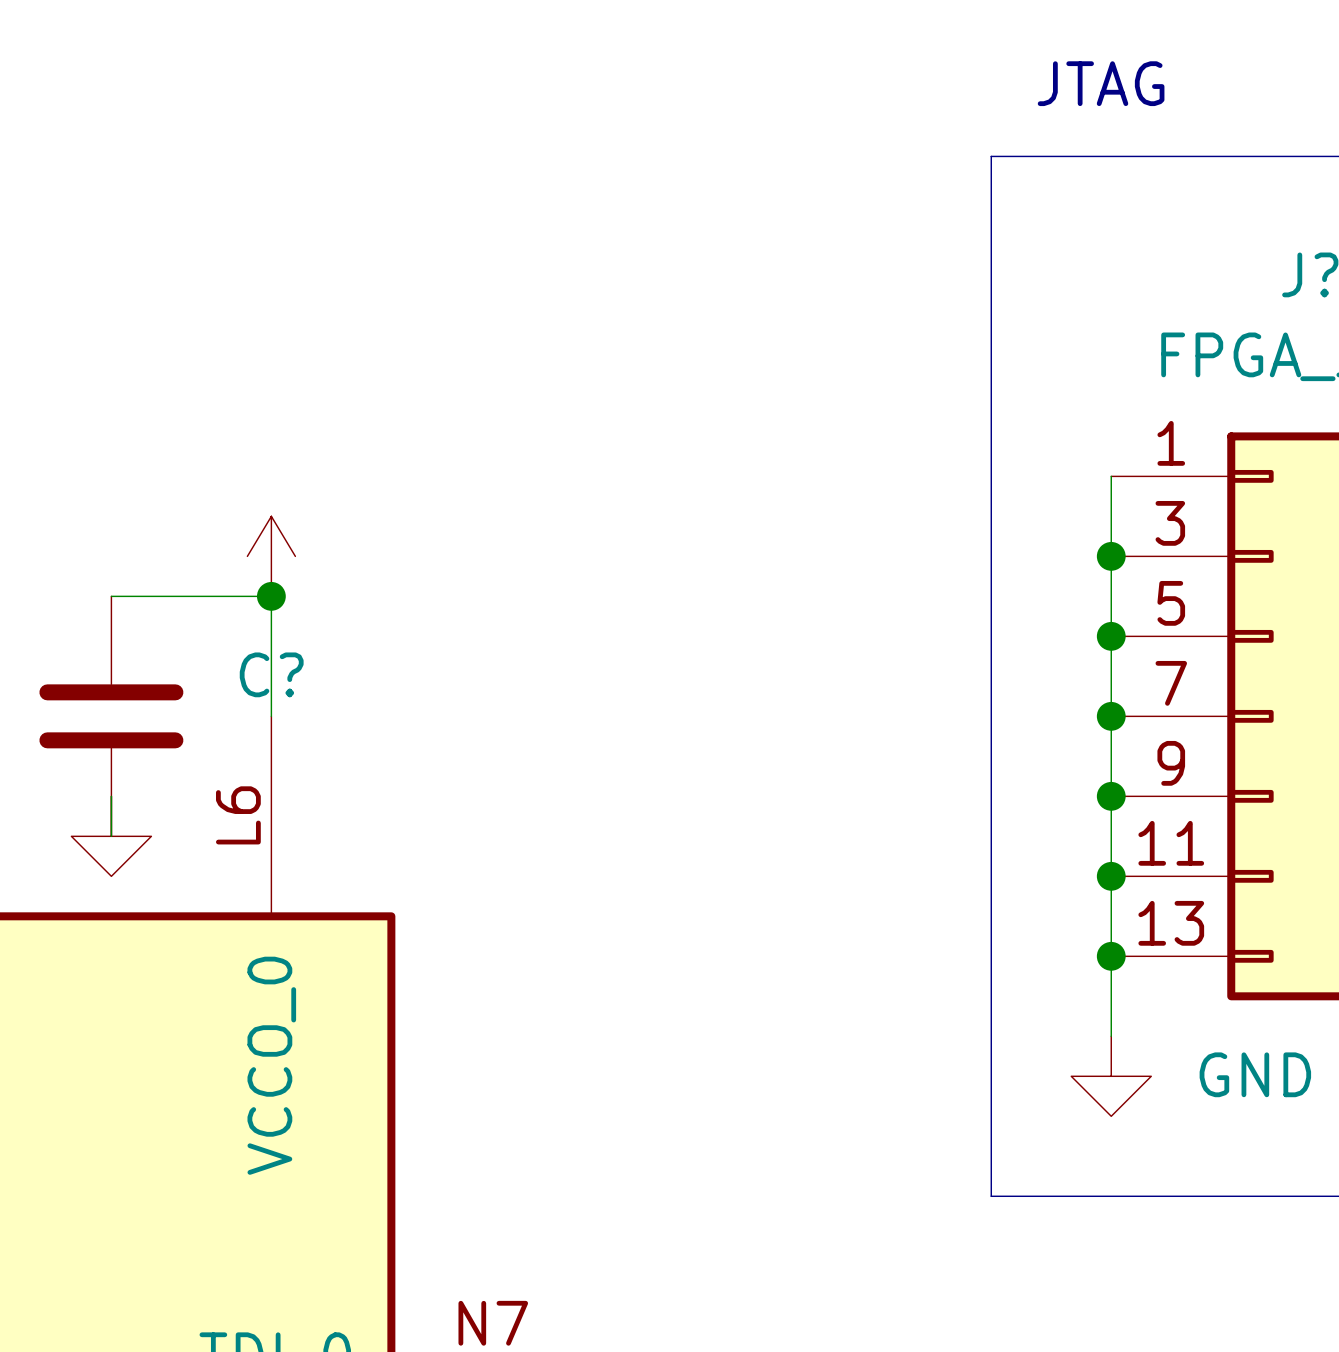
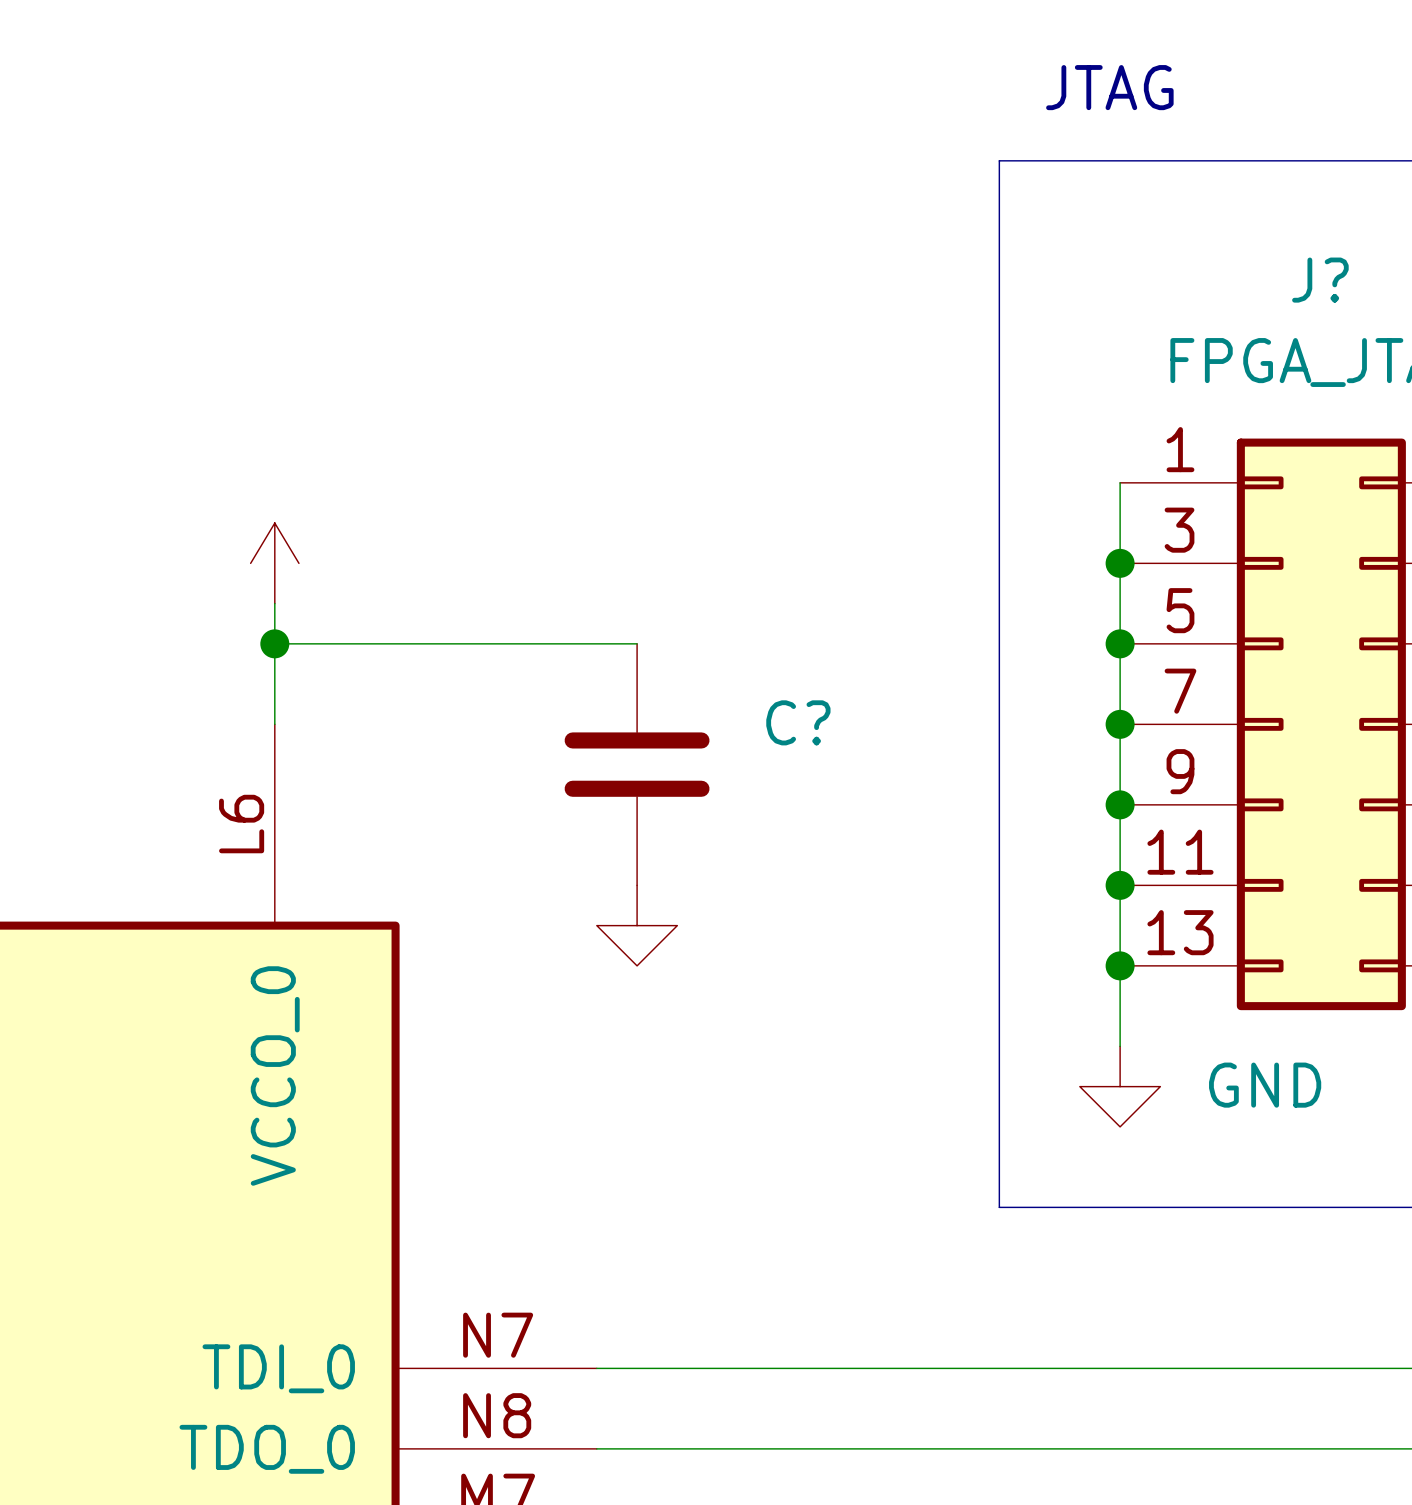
wire: (111, 596) (271, 596) -> none
junction position: (271, 596) -> (274, 643)
wire: none -> (274, 643) (637, 643)
C? position: (111, 716) -> (637, 764)
wire: (111, 796) (111, 836) -> none
power symbol position: (111, 836) -> (637, 925)

